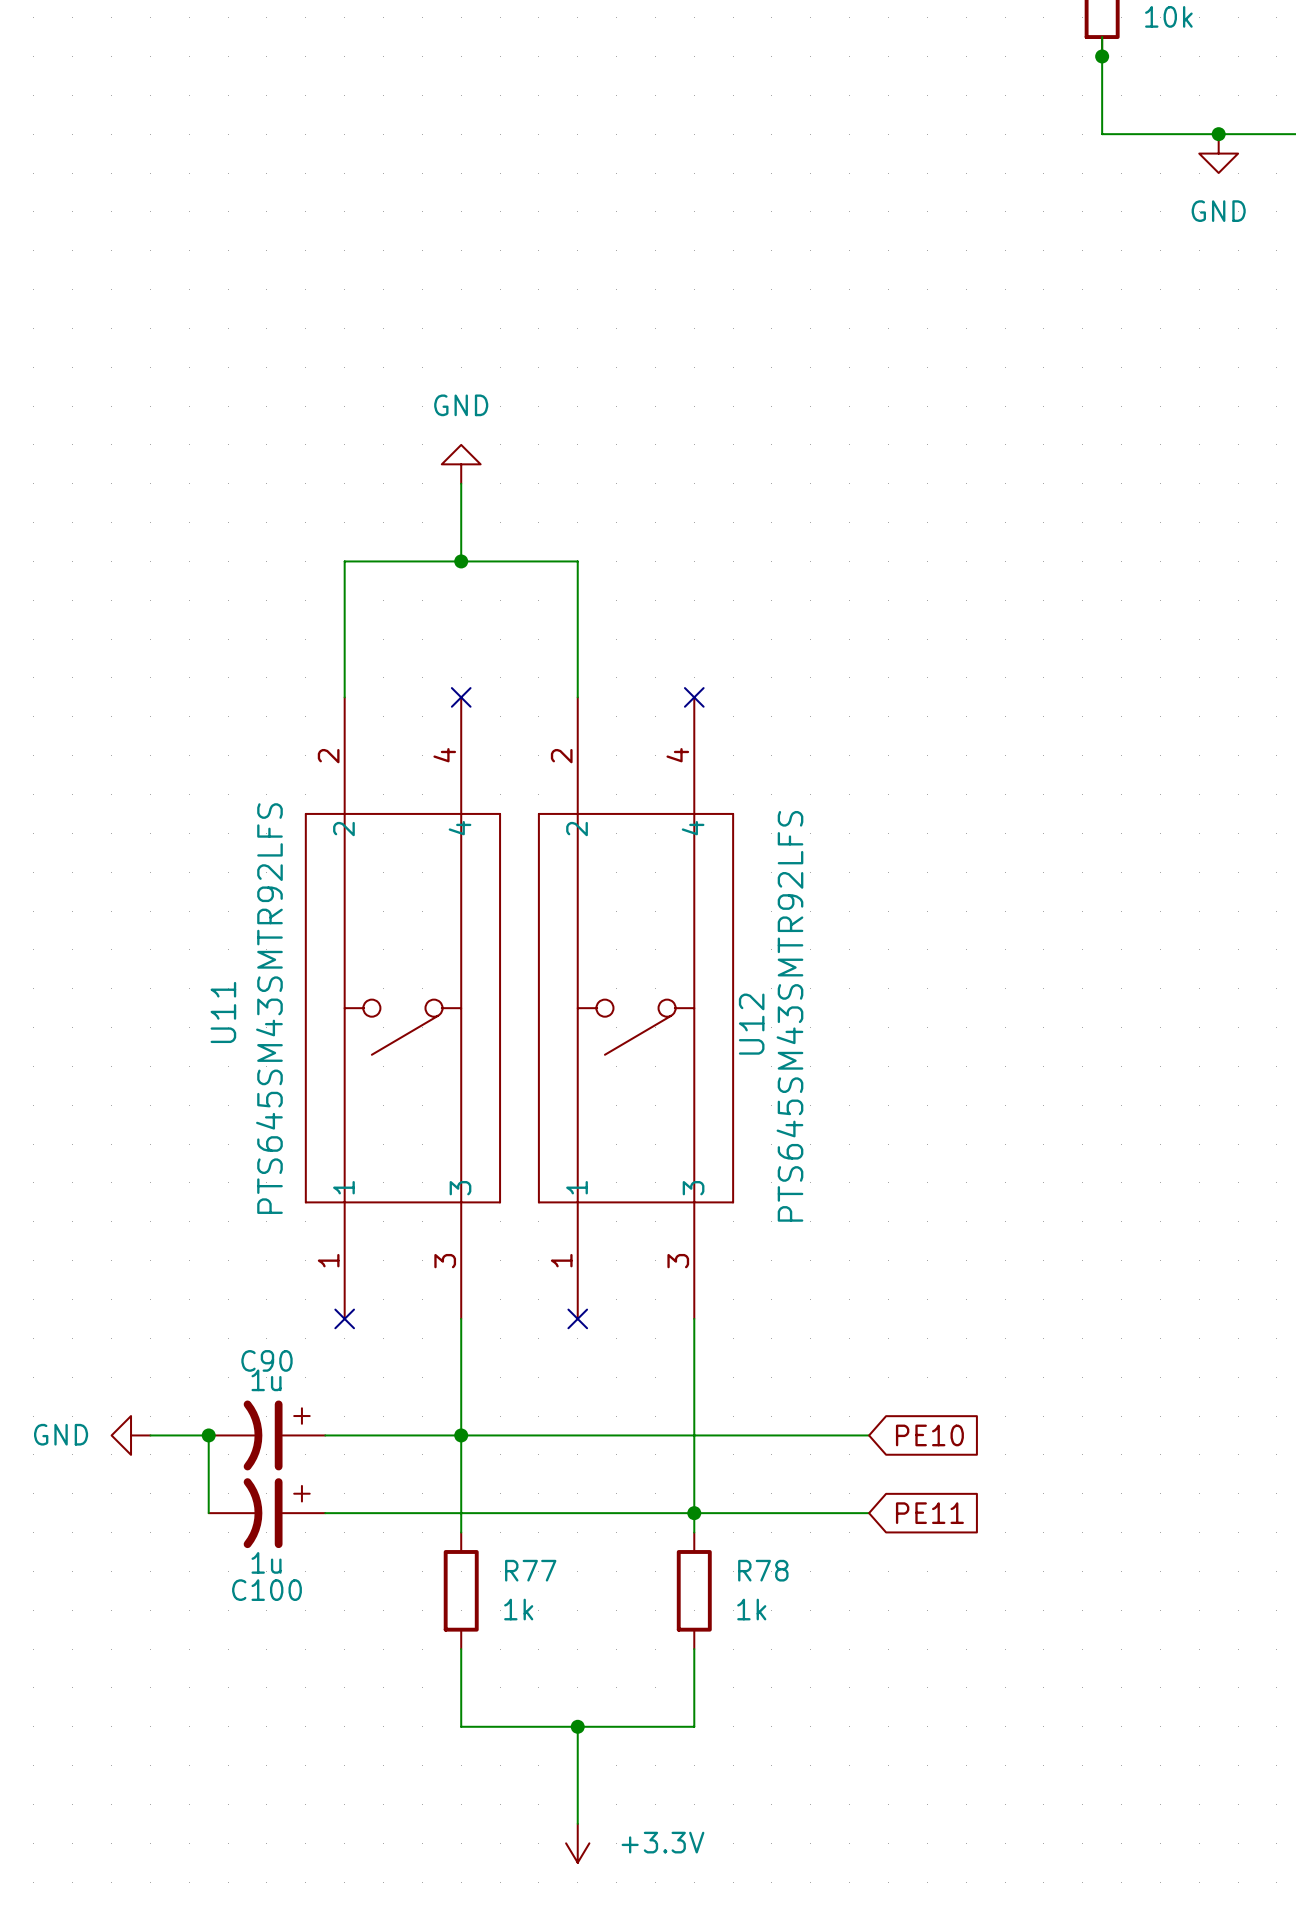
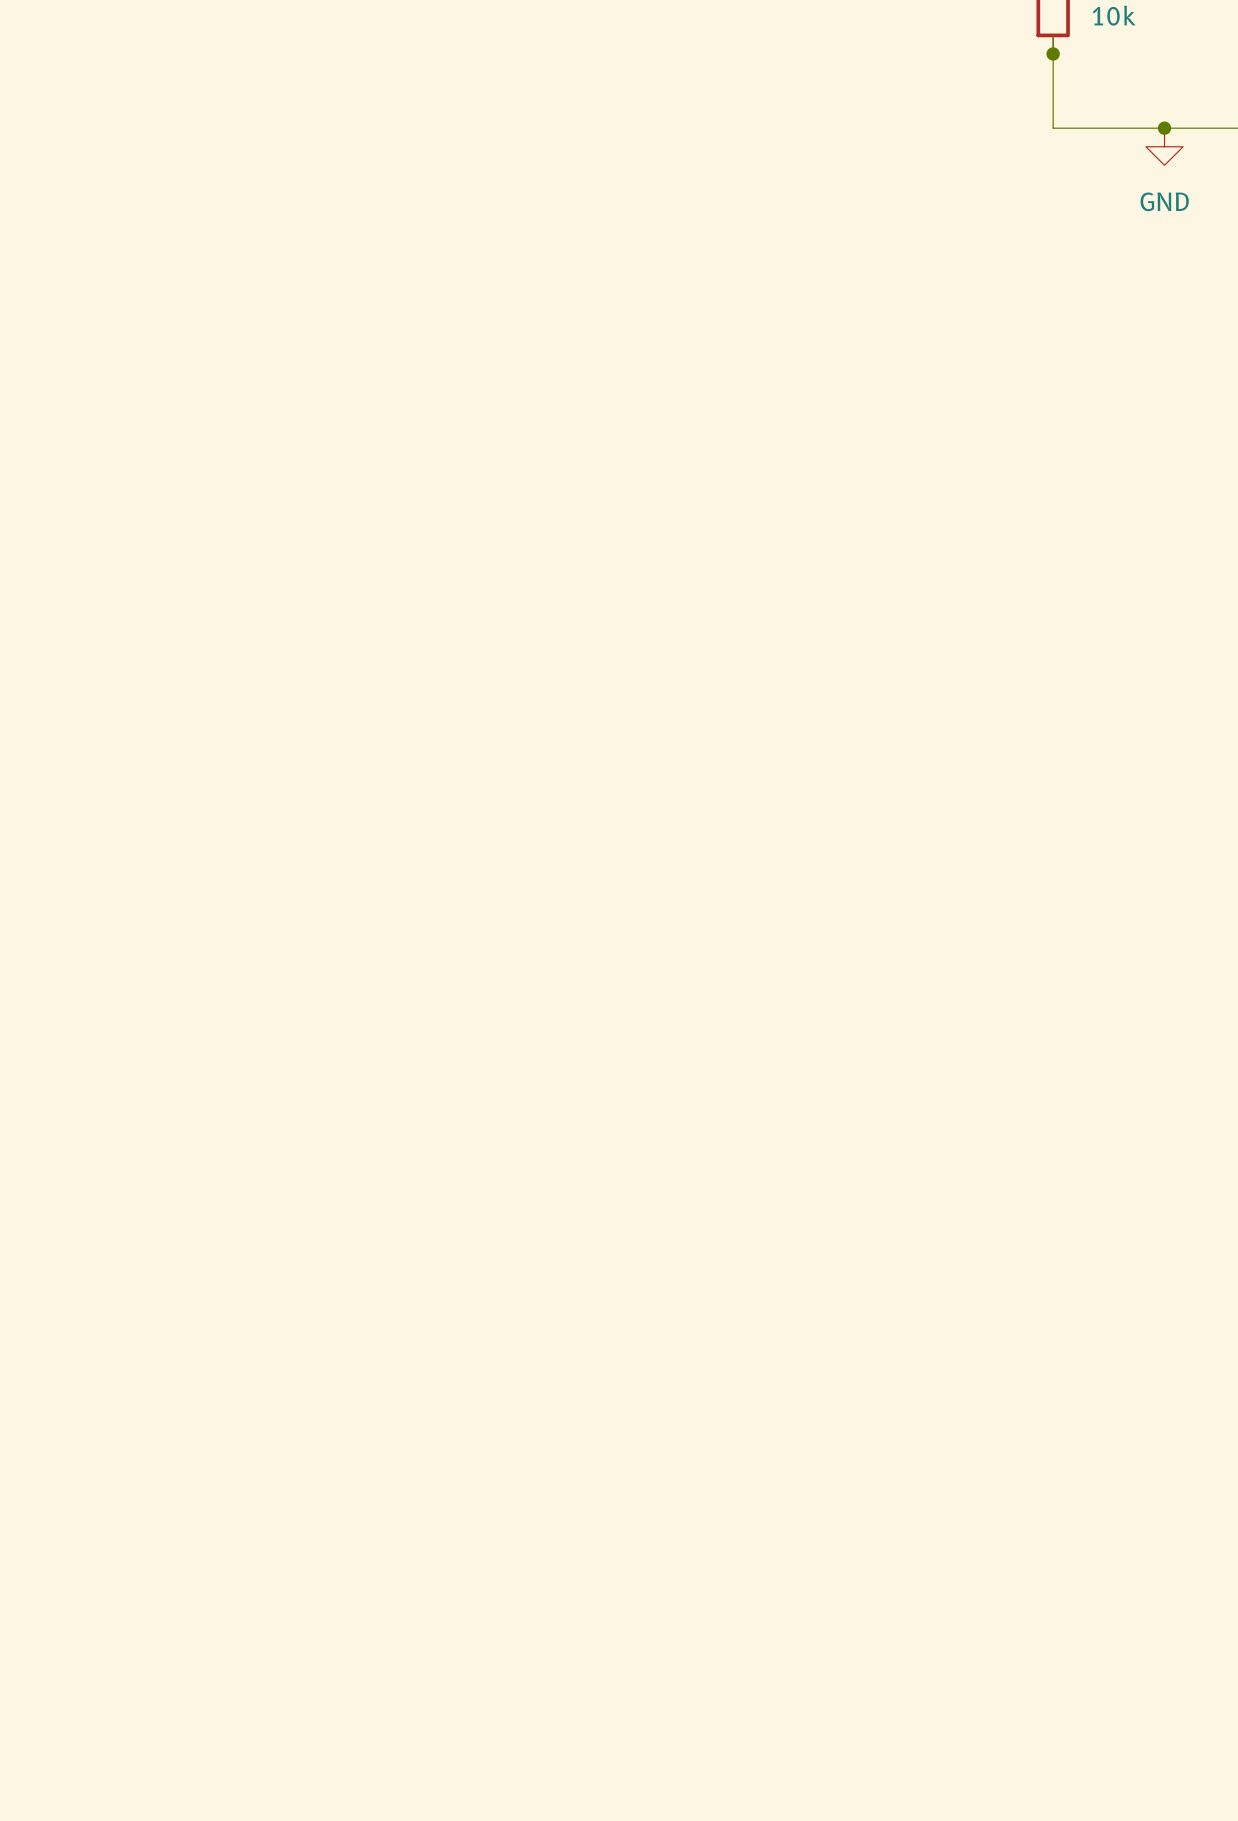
power symbol: GND (461, 464) -> none
wire: (461, 483) (461, 561) -> none
junction: (461, 561) -> none
wire: (344, 697) (344, 561) (577, 561) (577, 697) -> none
no-connect mark: (461, 697) -> none
no-connect mark: (694, 697) -> none
U11: PTS645SM43SMTR92LFS (402, 1008) -> none
U12: PTS645SM43SMTR92LFS (636, 1008) -> none
no-connect mark: (344, 1318) -> none
wire: (461, 1318) (461, 1532) -> none
no-connect mark: (577, 1318) -> none
wire: (694, 1318) (694, 1532) -> none
power symbol: GND (131, 1435) -> none
wire: (150, 1435) (208, 1435) (208, 1513) -> none
junction: (208, 1435) -> none
C90: 1u (266, 1435) -> none
wire: (325, 1435) (869, 1435) -> none
junction: (461, 1435) -> none
global label: PE10 (929, 1435) -> none
C100: 1u (266, 1513) -> none
wire: (325, 1513) (869, 1513) -> none
junction: (694, 1513) -> none
global label: PE11 (929, 1513) -> none
R77: 1k (461, 1590) -> none
R78: 1k (694, 1590) -> none
wire: (461, 1649) (461, 1726) (694, 1726) (694, 1649) -> none
wire: (577, 1726) (577, 1823) -> none
junction: (577, 1726) -> none
power symbol: +3.3V (577, 1843) -> none

